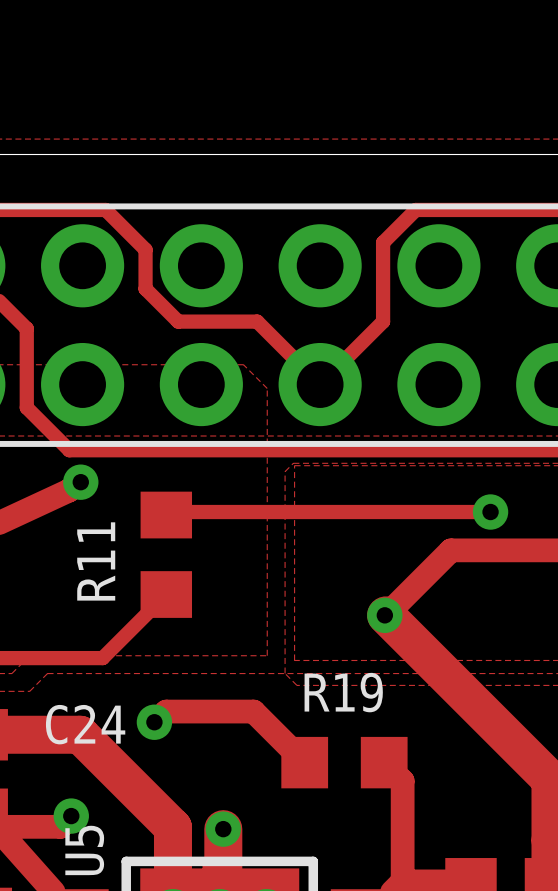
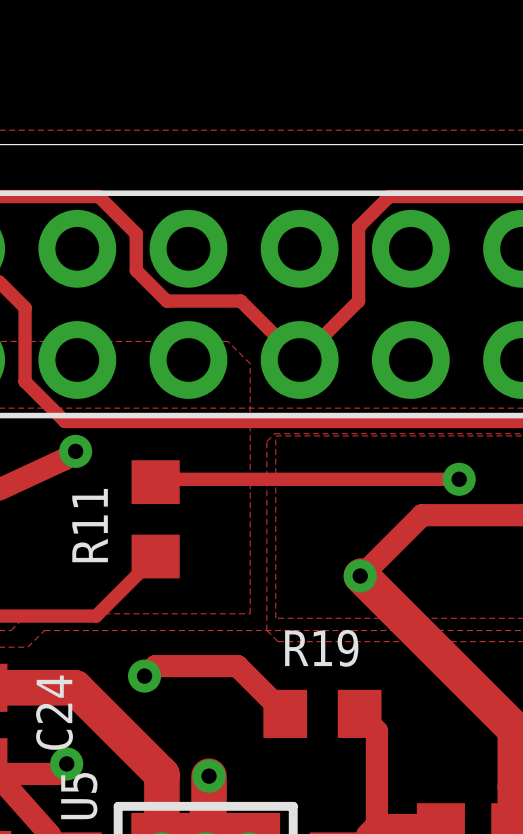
C24 name rotation: 0° (85, 724) -> 90° counterclockwise (54, 712)

